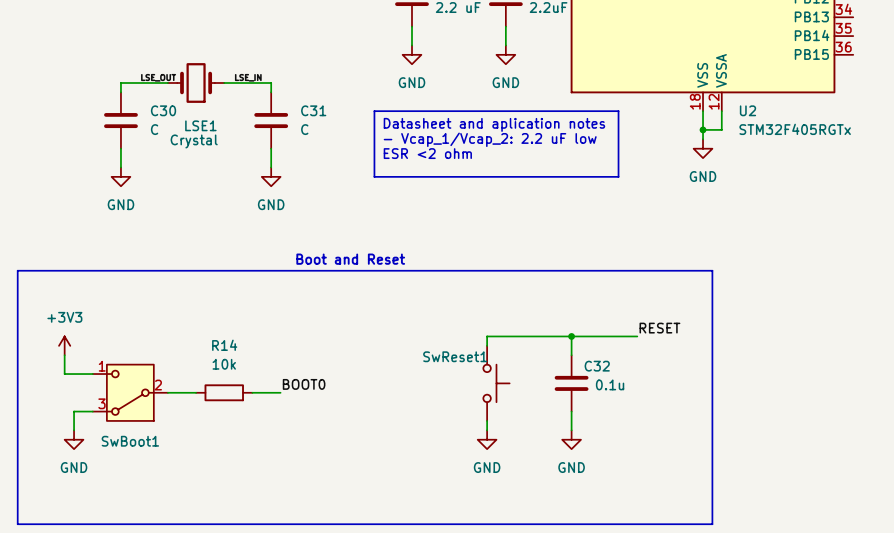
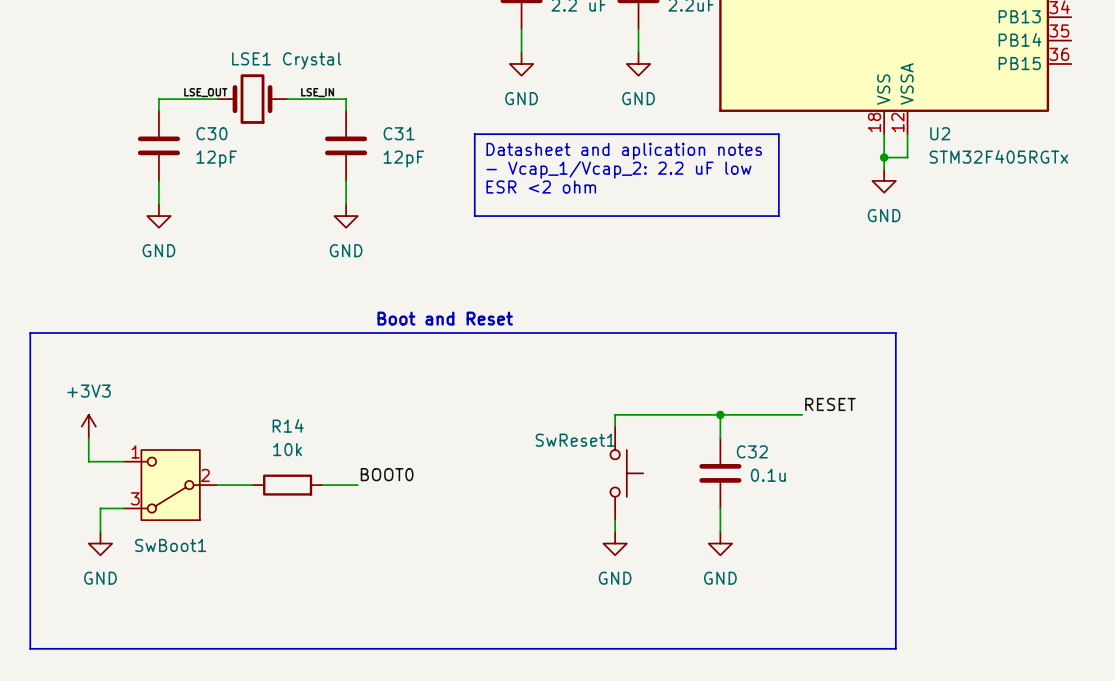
LSE1 name position: LSE1 (200, 125) -> LSE1 (251, 58)
C30 value: C (154, 129) -> 12pF (216, 159)
C31 value: C (304, 129) -> 12pF (403, 159)
LSE1 value position: Crystal (194, 141) -> Crystal (312, 60)

